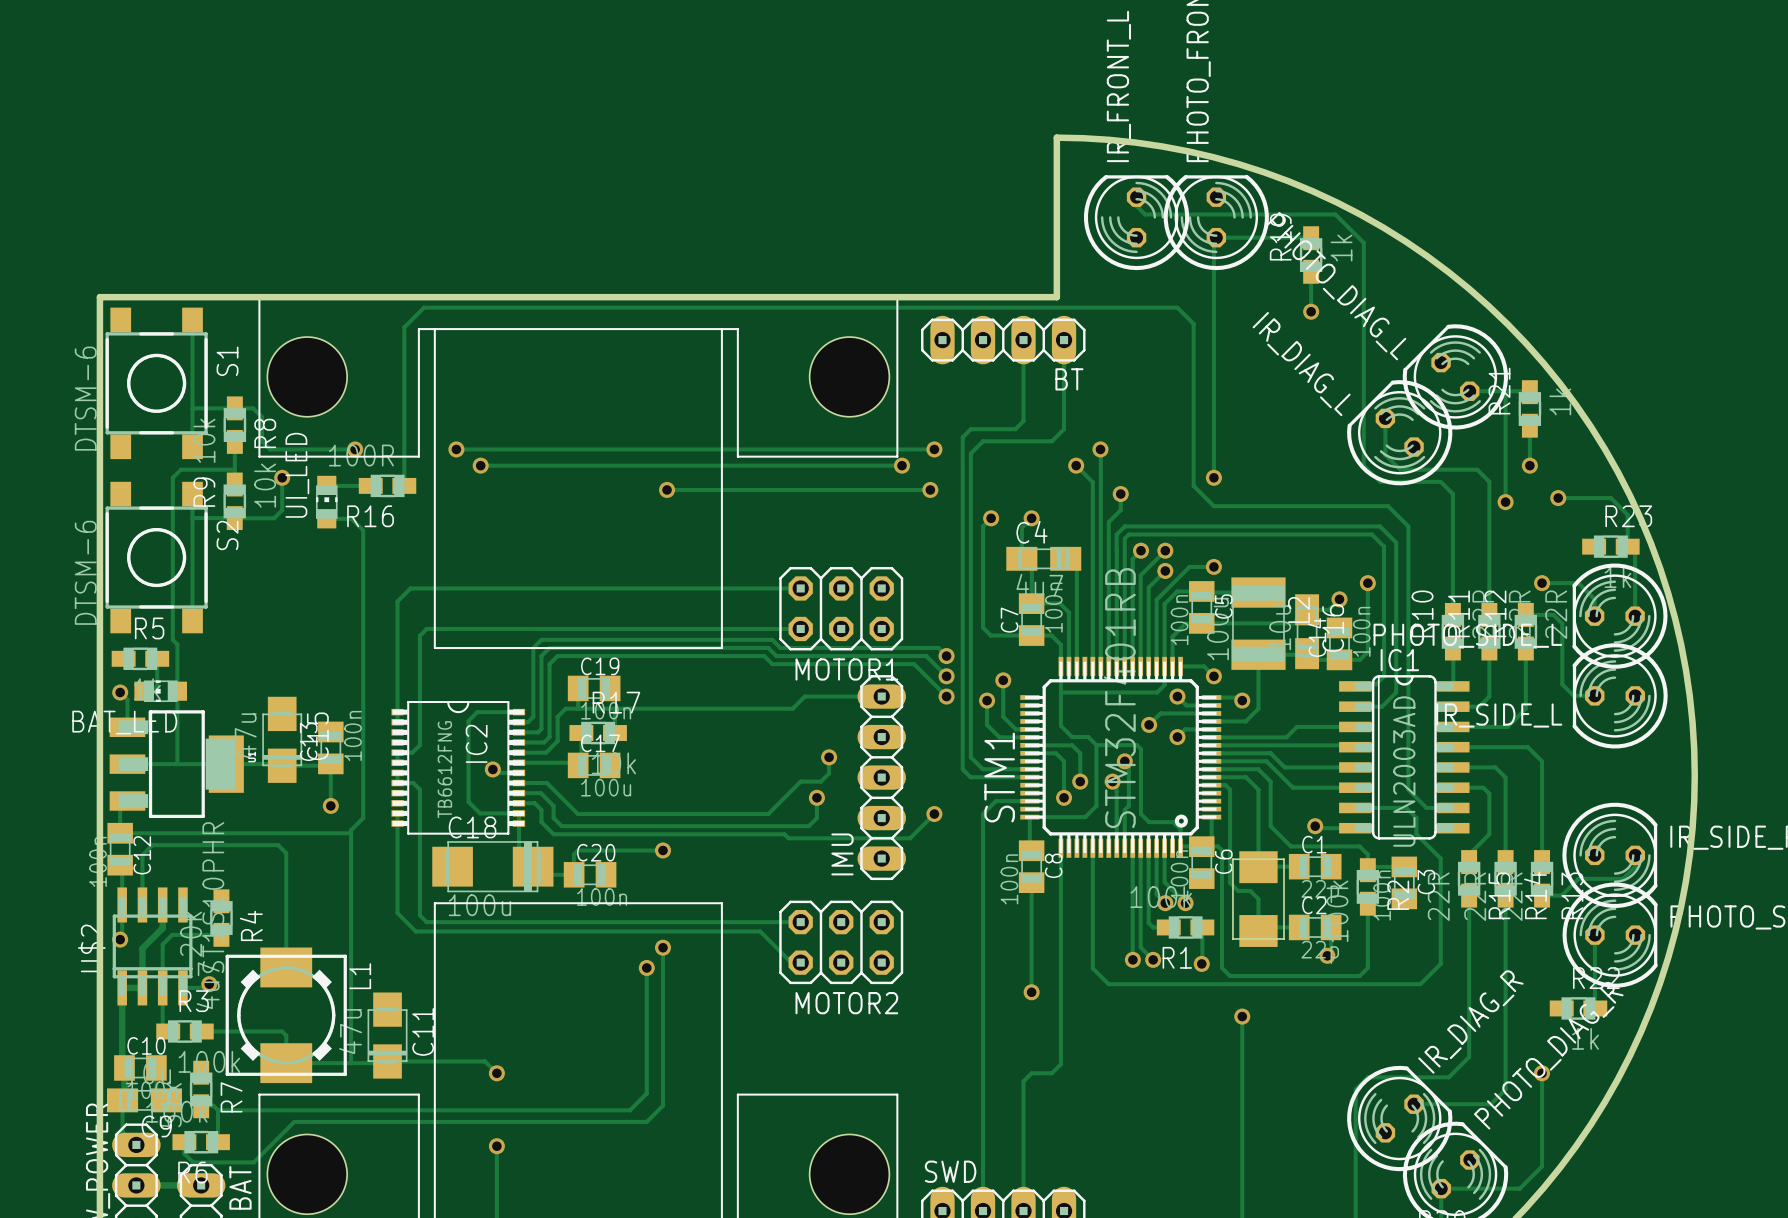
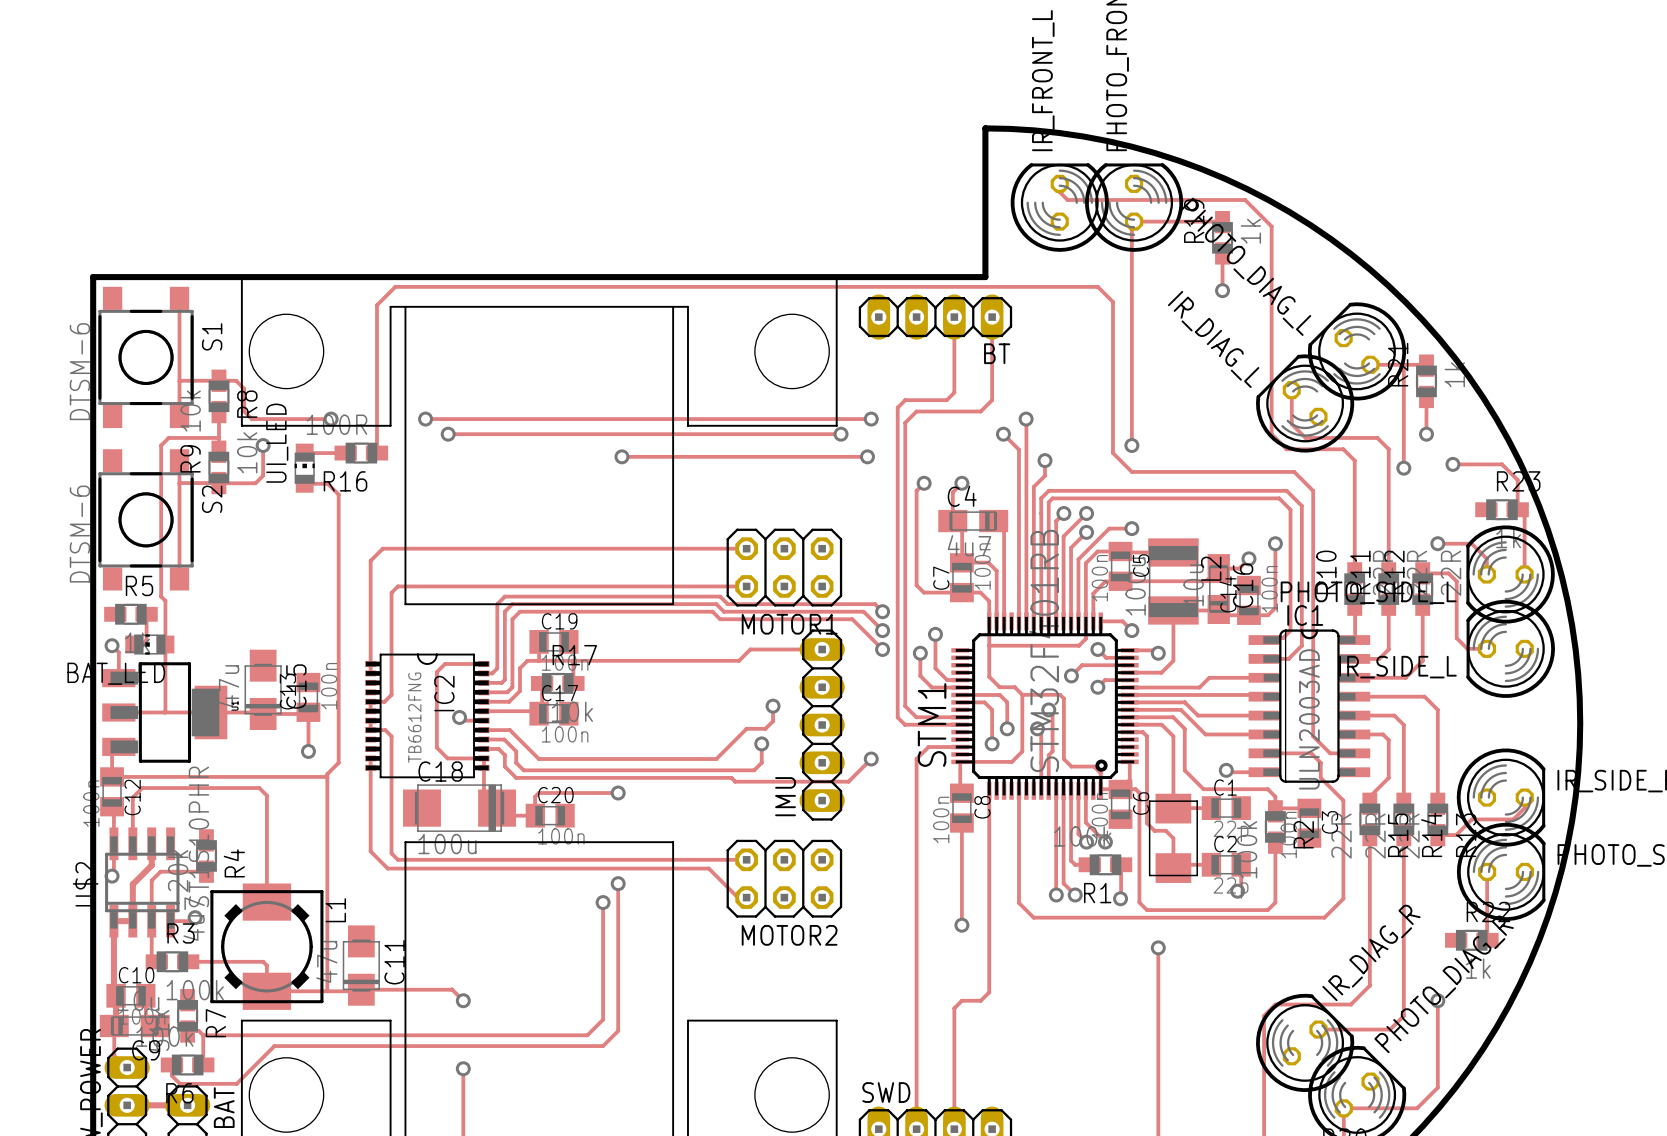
C17 value: 100u (606, 787) -> 100n (565, 734)

